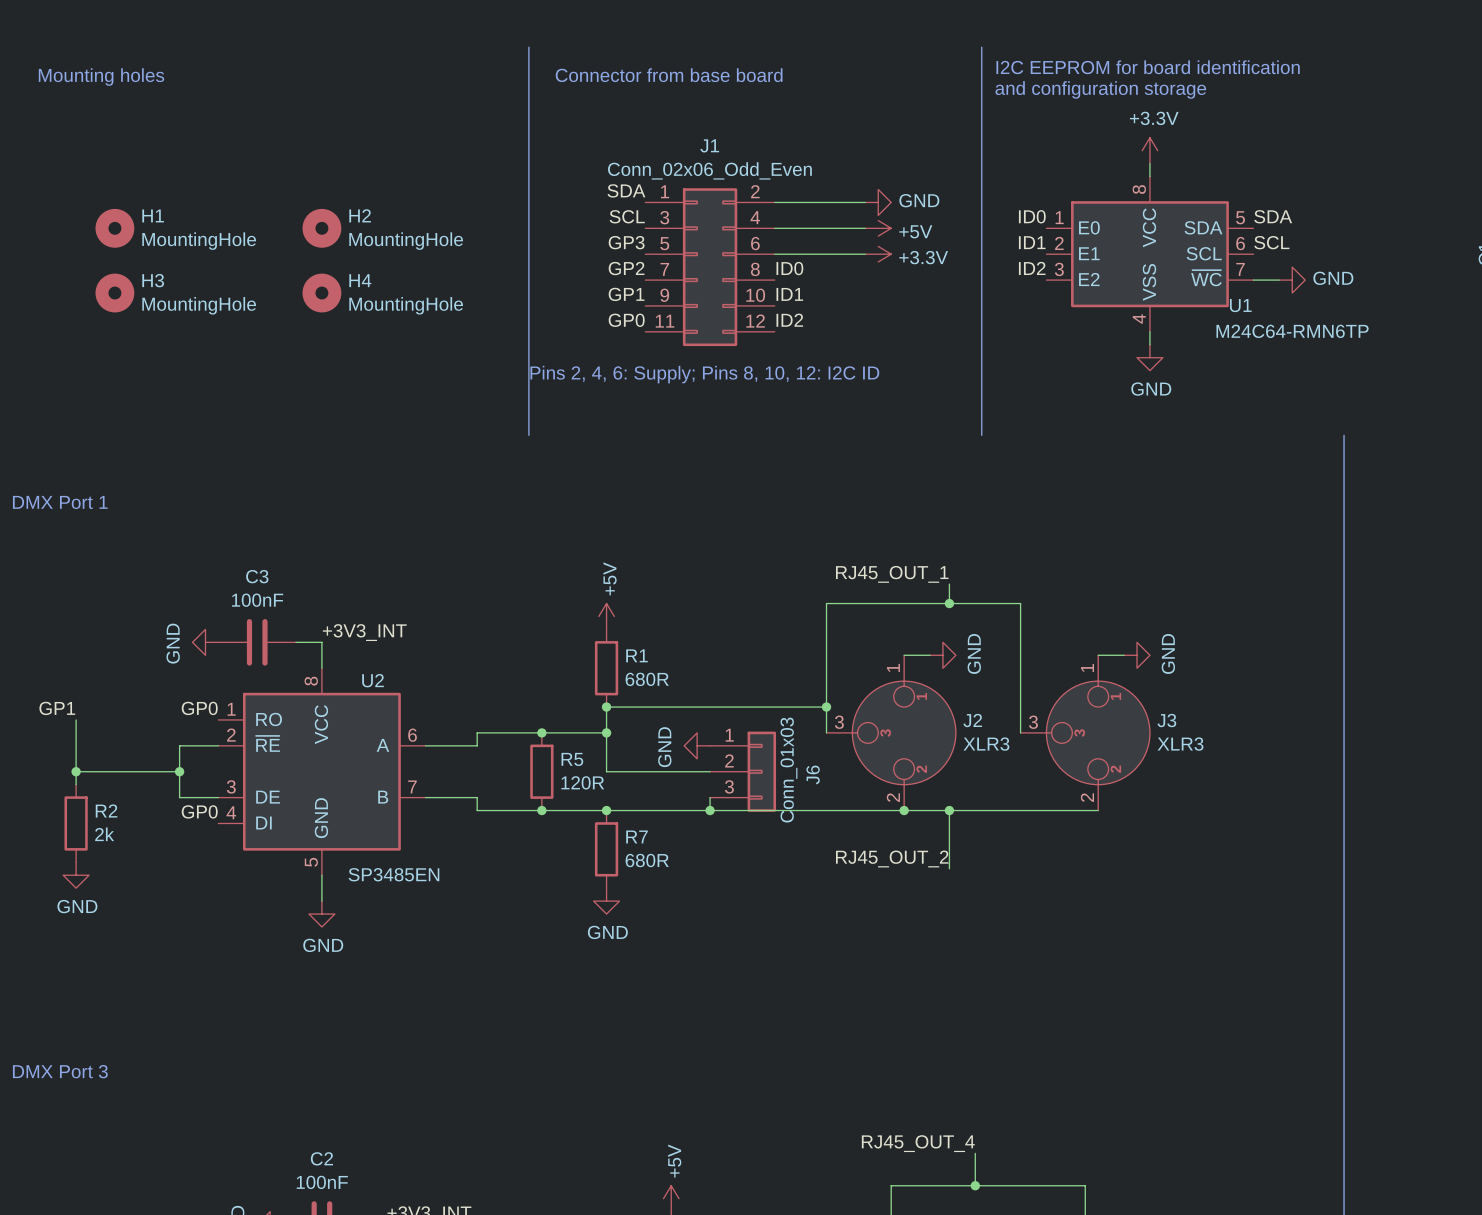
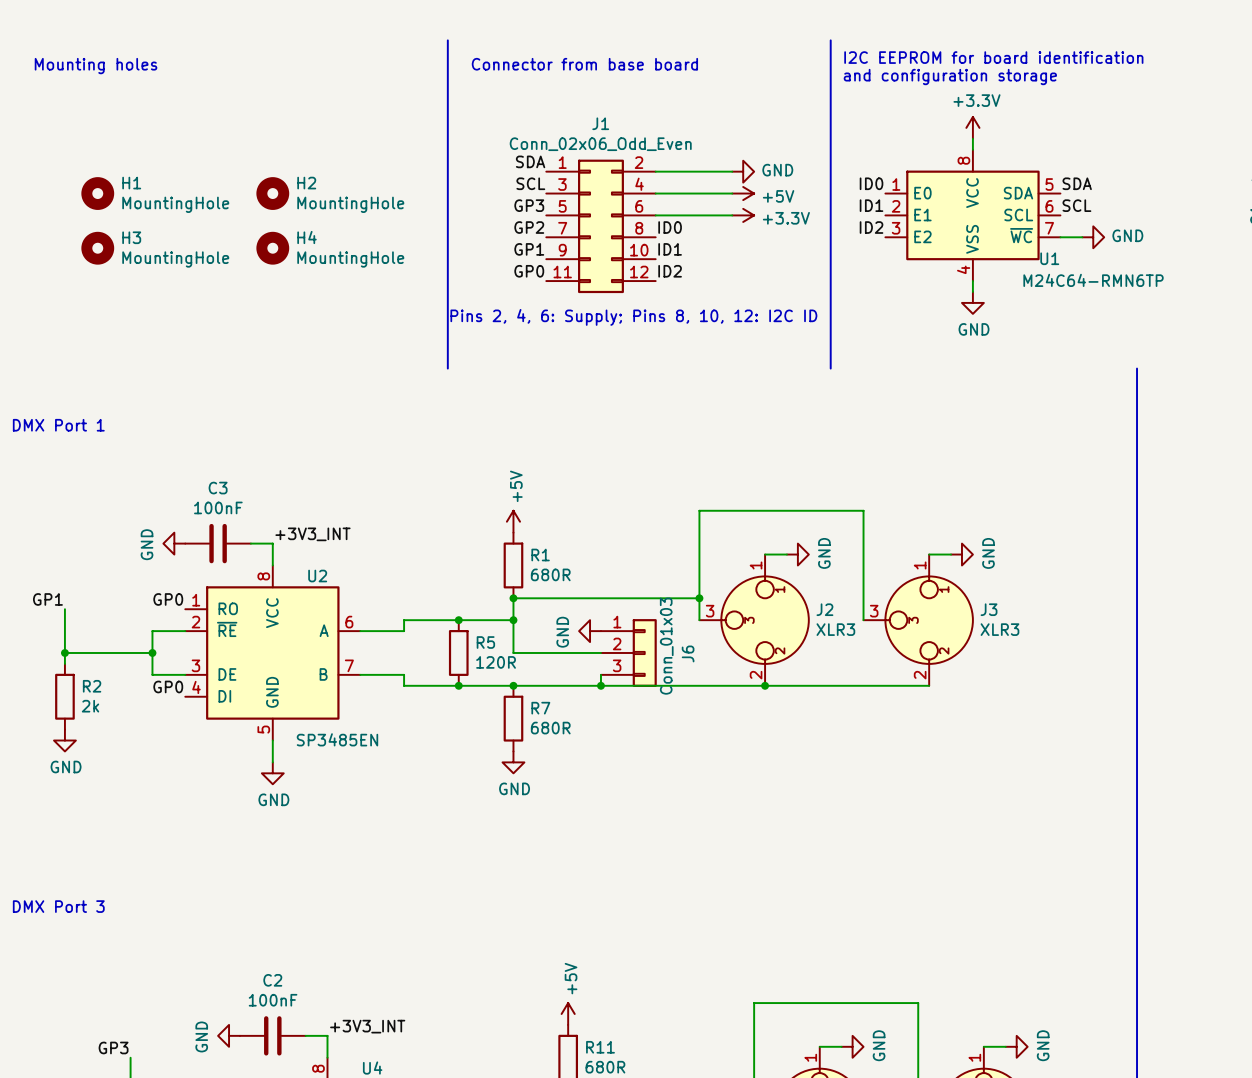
label: RJ45_OUT_1 (892, 574) -> none
wire: (949, 584) (949, 603) -> none
junction: (949, 603) -> none
wire: (949, 810) (949, 868) -> none
junction: (949, 810) -> none
label: RJ45_OUT_2 (892, 858) -> none
label: RJ45_OUT_4 (918, 1143) -> none
wire: (975, 1153) (975, 1185) -> none
junction: (975, 1185) -> none

